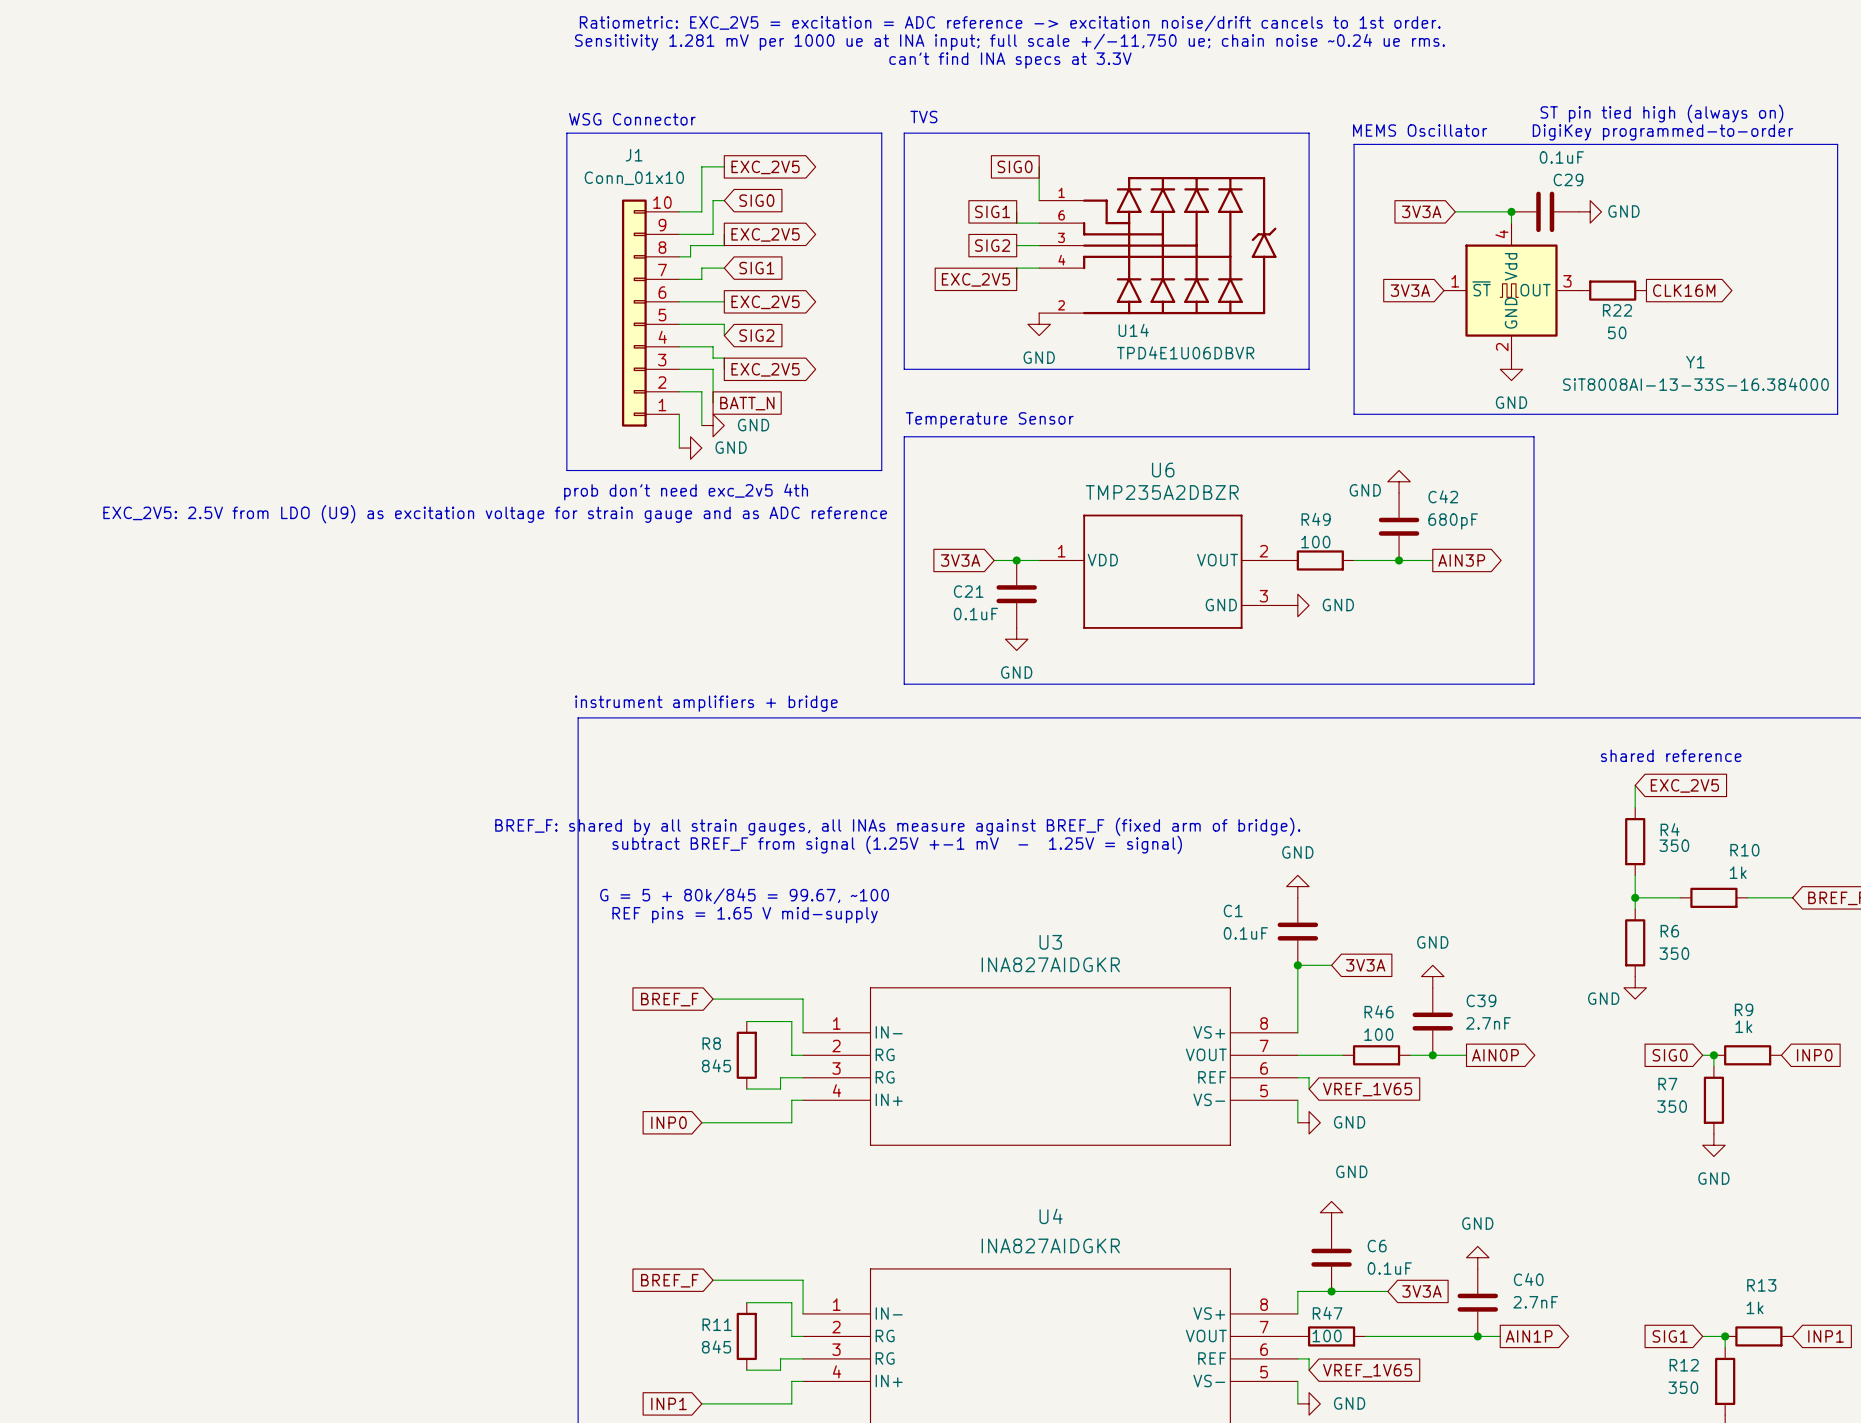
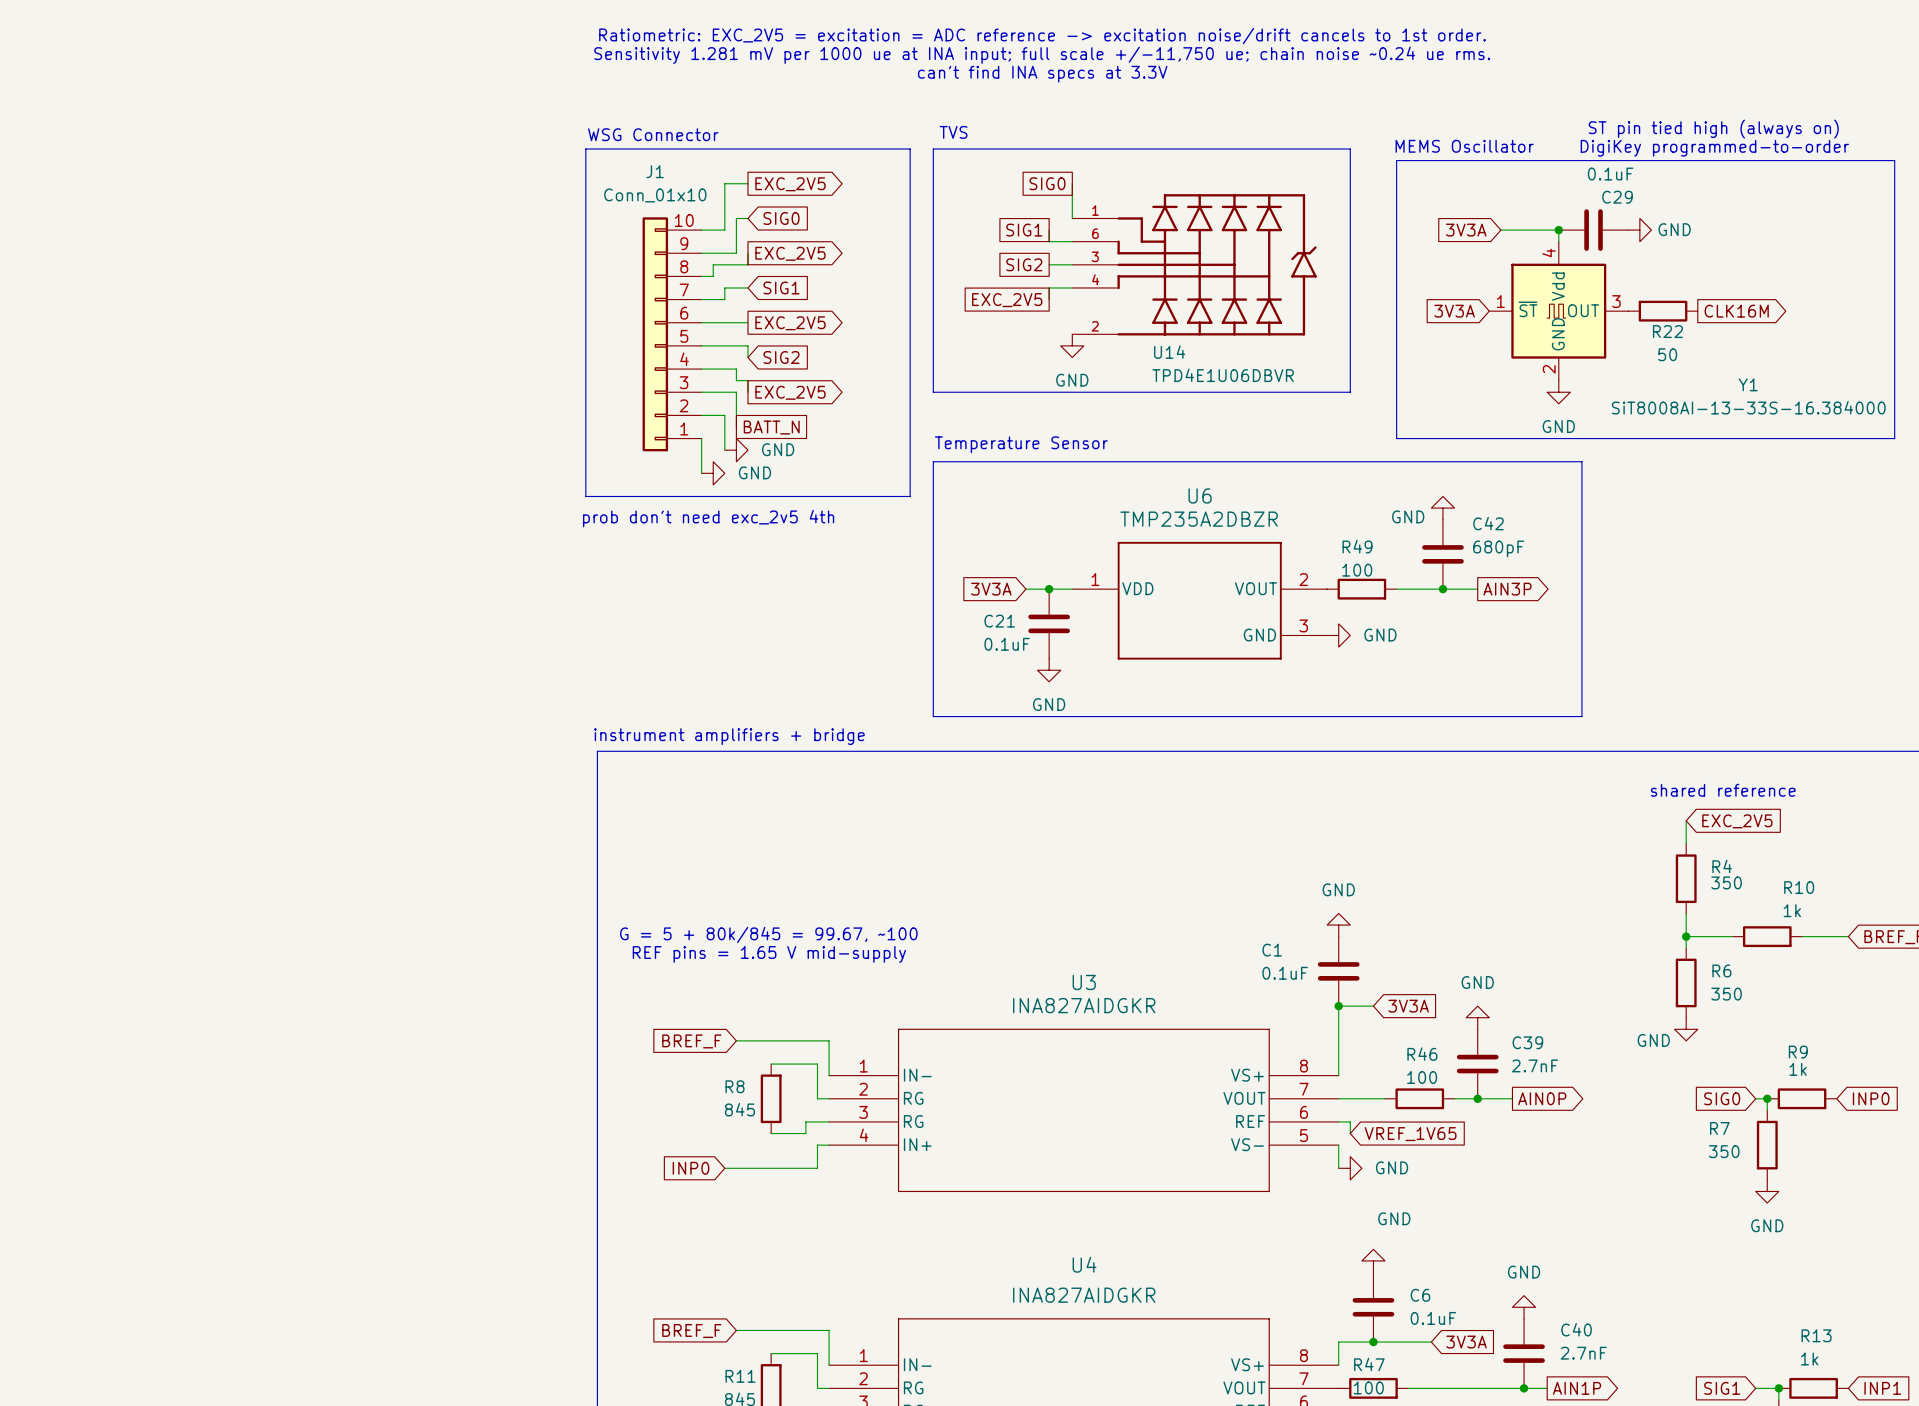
text: EXC_2V5: 2.5V from LDO (U9) as excitation voltage for strain gauge and as ADC reference (495, 514) -> none
text: BREF_F: shared by all strain gauges, all INAs measure against BREF_F (fixed arm of bridge). (897, 826) -> none
text: subtract BREF_F from signal (1.25V +-1 mV - 1.25V = signal) (897, 844) -> none

